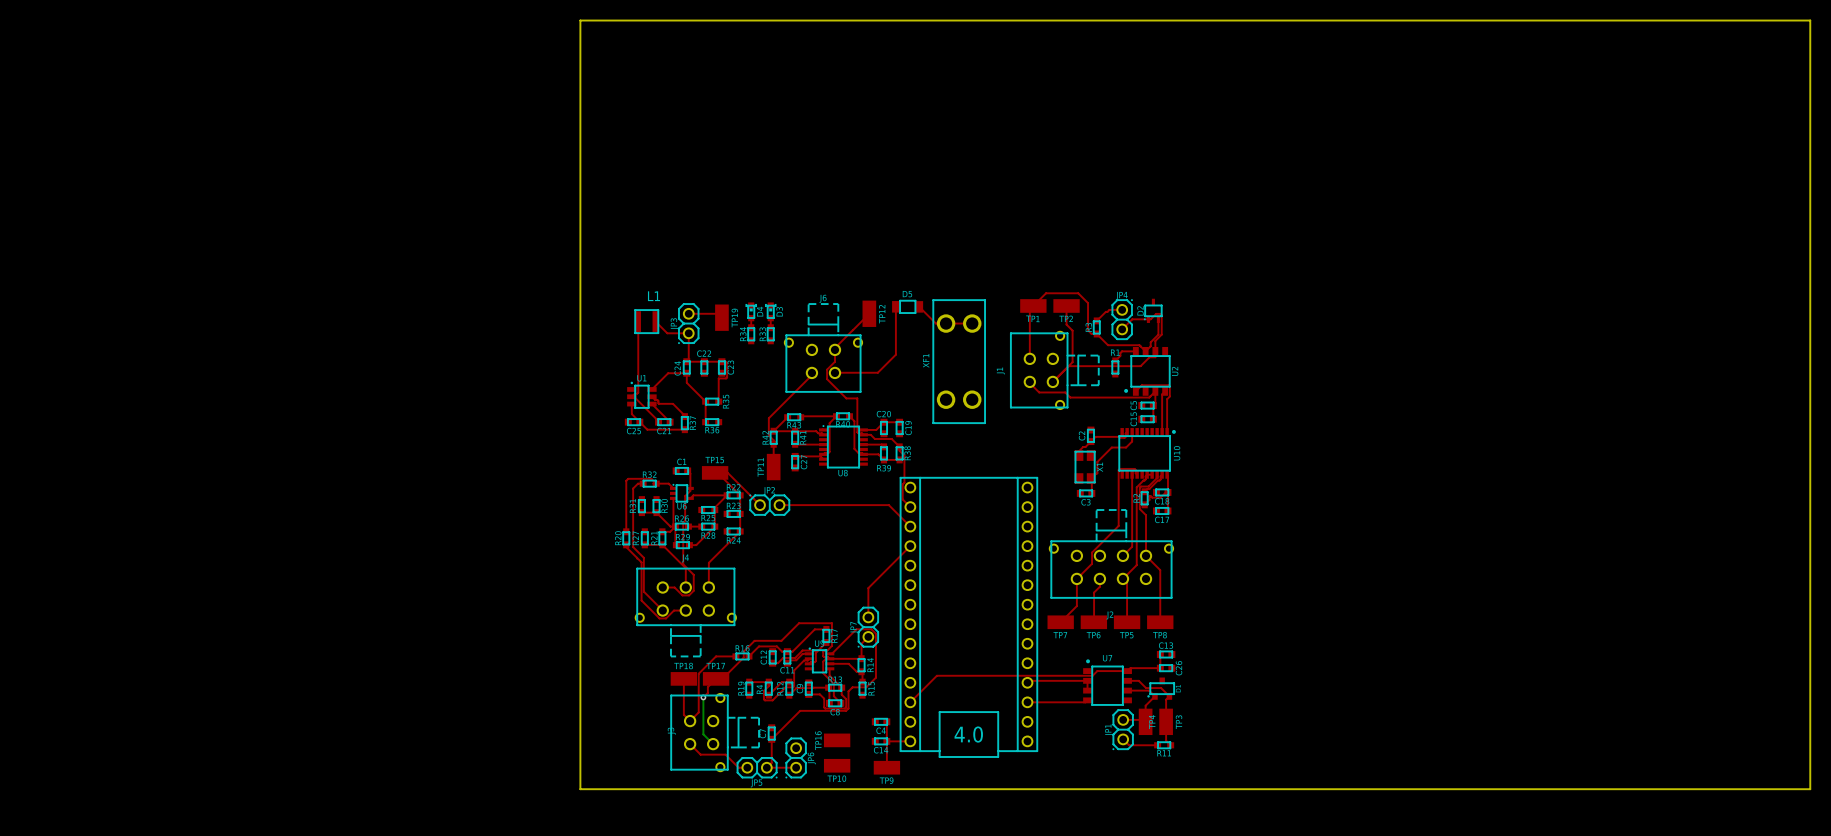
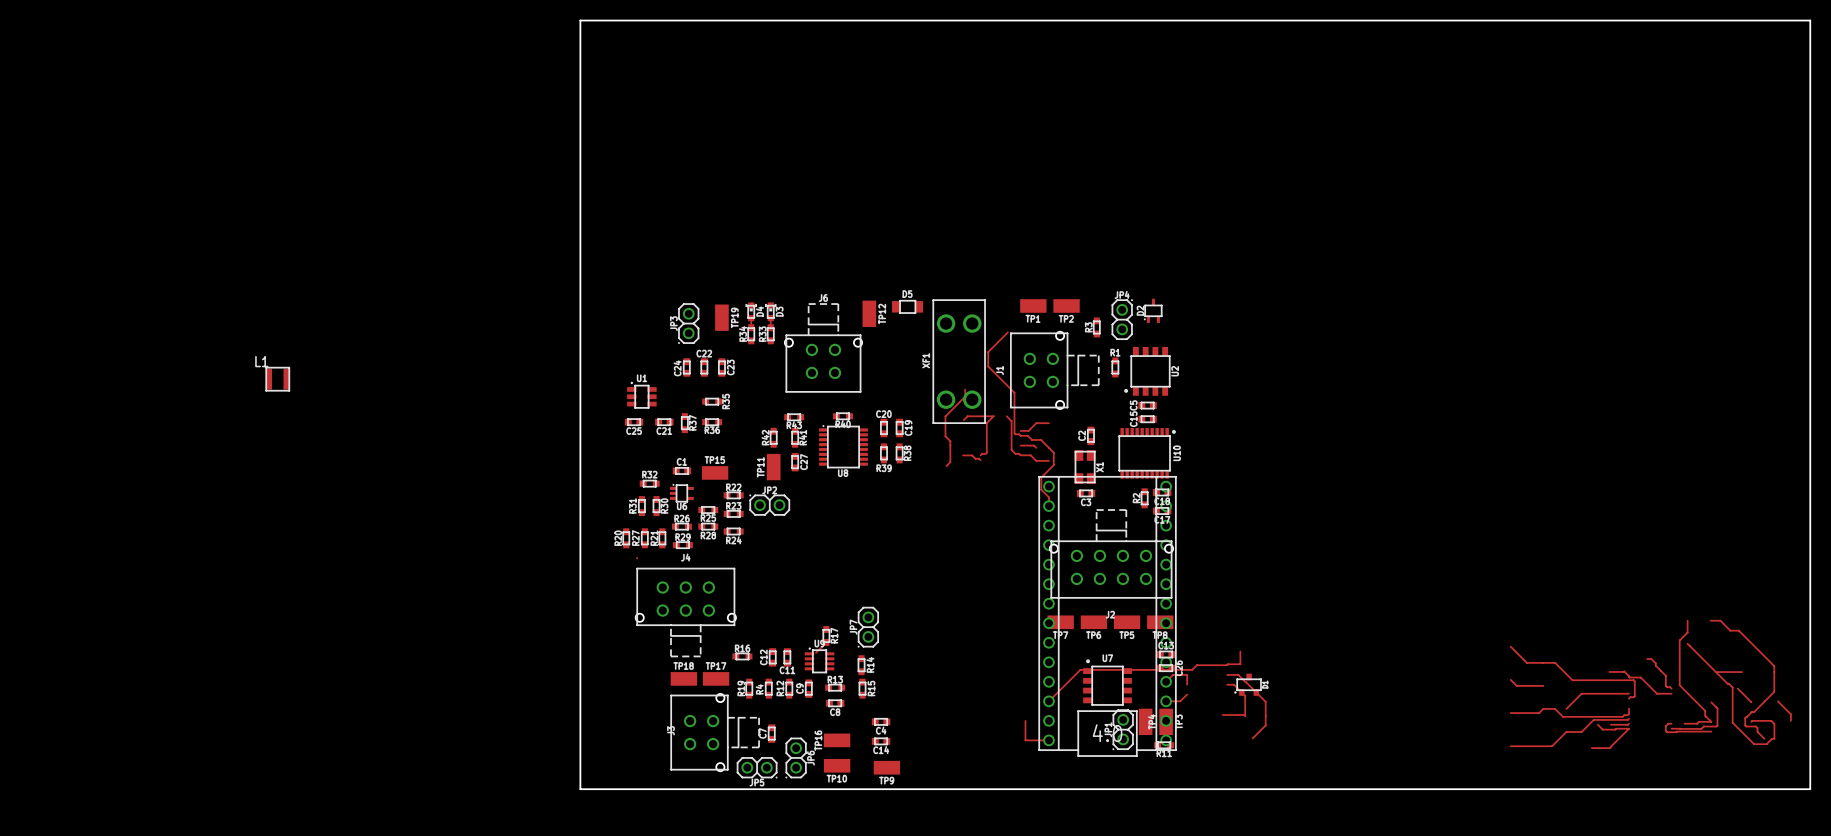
L1 name position: L1 (654, 296) -> L1 (261, 361)
top track: (1066, 305) (1066, 324) (1072, 330) (1072, 362) (1052, 381) -> none
top track: (895, 306) (895, 354) (877, 372) (834, 372) -> none
top track: (919, 306) (935, 323) (972, 323) -> none
top track: (1122, 309) (1109, 309) (1096, 320) -> none
top track: (688, 313) (718, 313) (721, 317) -> none
top track: (869, 313) (852, 330) -> none
top track: (1158, 319) (1158, 334) (1150, 342) (1150, 346) (1145, 351) (1140, 346) -> none
top track: (637, 321) (638, 392) (631, 396) (634, 396) (658, 422) -> none
L1 position: (646, 321) -> (277, 379)
top track: (655, 321) (667, 333) (688, 333) (688, 359) (686, 361) (726, 362) (727, 377) (718, 378) (718, 401) -> none
top track: (1122, 329) (1132, 319) (1150, 319) (1156, 313) (1160, 313) (1161, 334) (1155, 340) (1155, 357) (1149, 357) (1140, 366) (1068, 366) -> none
top track: (852, 330) (834, 348) (834, 361) (827, 369) (827, 379) (846, 398) (857, 398) (858, 433) (870, 434) (874, 438) (891, 438) (899, 446) (899, 450) (904, 455) (902, 499) (910, 507) -> none
top track: none -> (1007, 332) (988, 352) (988, 366) (1014, 392) (1014, 433) (1027, 435) (1032, 439) (1041, 439) (1053, 452) (1053, 465) (1041, 477) (1041, 489) (1048, 497) (1048, 506)
top track: (1140, 346) (1108, 345) (1096, 333) (1091, 333) (1088, 330) (1088, 303) (1078, 293) (1046, 293) (1029, 309) (1029, 358) -> none
top track: (1135, 351) (1122, 351) (1115, 360) -> none
top track: (811, 372) (811, 375) (768, 418) (768, 435) (773, 440) (773, 467) -> none
top track: (1029, 381) (1039, 392) (1065, 392) (1070, 397) (1149, 397) (1155, 391) (1153, 419) -> none
top track: (651, 389) (668, 373) (686, 373) (686, 382) (705, 401) (705, 422) -> none
top track: none -> (965, 389) (965, 396) (945, 416) (945, 436) (950, 441) (950, 462) (946, 466)
top track: (1135, 391) (1141, 385) (1169, 386) (1169, 396) (1167, 399) (1167, 432) -> none
top track: (1165, 391) (1162, 394) (1162, 432) -> none
top track: (651, 396) (657, 399) (659, 403) (672, 403) (684, 416) -> none
top track: (631, 404) (631, 414) (647, 429) (684, 429) -> none
top track: (652, 404) (670, 422) -> none
top track: (849, 416) (854, 421) (854, 448) (858, 452) (878, 454) (883, 459) (899, 459) -> none
top track: none -> (1006, 416) (1011, 421) (1011, 449) (1020, 455) (1030, 455) (1036, 460) (1048, 460)
top track: (787, 417) (773, 431) (816, 431) (823, 434) -> none
top track: (800, 417) (836, 416) (829, 423) (829, 451) (823, 454) -> none
top track: none -> (963, 420) (967, 416) (993, 416) (986, 423) (986, 452) (980, 455)
top track: (899, 422) (883, 422) (876, 429) (863, 429) -> none
top track: none -> (1048, 423) (1036, 423) (1028, 430) (1020, 430)
top track: (1127, 432) (1124, 437) (1095, 436) (1078, 451) (1078, 455) -> none
top track: (1132, 432) (1132, 441) (1126, 447) (1111, 447) (1097, 461) (1097, 473) (1091, 478) (1091, 493) -> none
top track: (795, 444) (823, 444) -> none
top track: (863, 444) (881, 444) (883, 446) -> none
top track: none -> (1020, 445) (1034, 445) (1036, 447)
top track: none -> (963, 455) (972, 455) (980, 460)
top track: (795, 456) (820, 456) (823, 459) -> none
top track: (687, 470) (690, 473) (690, 490) (685, 496) (683, 564) (693, 574) (693, 590) (689, 595) (682, 595) (674, 587) (662, 587) -> none
top track: (716, 471) (727, 472) (760, 505) -> none
top track: (717, 472) (740, 495) (740, 531) (708, 562) (708, 587) -> none
top track: (1132, 474) (1132, 546) (1122, 555) -> none
top track: (1137, 474) (1134, 468) (1118, 469) (1118, 525) (1092, 552) (1092, 563) (1076, 578) (1076, 606) (1060, 622) -> none
top track: (1152, 474) (1147, 474) (1145, 479) (1136, 487) (1136, 565) (1122, 578) (1127, 583) (1127, 622) -> none
top track: (1157, 474) (1157, 477) (1148, 486) (1139, 487) (1139, 509) (1146, 515) (1146, 555) (1160, 570) (1160, 622) -> none
top track: (1162, 474) (1159, 480) (1145, 491) -> none
top track: (1167, 474) (1167, 510) -> none
top track: (653, 483) (668, 483) (673, 488) -> none
top track: (656, 483) (651, 478) (628, 478) (626, 480) (626, 531) -> none
top track: (643, 484) (638, 483) (633, 488) (633, 547) (643, 557) (643, 591) (662, 610) -> none
top track: (1167, 492) (1160, 497) (1149, 496) (1149, 499) (1144, 504) -> none
top track: (673, 498) (673, 524) (675, 526) -> none
top track: (690, 498) (693, 495) (727, 495) (714, 507) (714, 526) (696, 545) (689, 545) -> none
top track: (779, 505) (888, 505) (910, 526) -> none
top track: (641, 512) (656, 512) (670, 526) (675, 526) -> none
top track: (675, 526) (676, 545) -> none
top track: (675, 526) (670, 531) (662, 531) -> none
top track: (688, 526) (701, 526) -> none
top track: (626, 544) (641, 562) (641, 600) (659, 618) (666, 618) (673, 610) (685, 610) -> none
top track: (644, 544) (662, 544) (685, 568) (685, 587) -> none
top track: (910, 546) (868, 588) (868, 617) -> none
top track: (1099, 578) (1099, 586) (1094, 592) (1093, 622) -> none
part position: (968, 617) -> (1107, 616)
top track: none -> (1687, 620) (1687, 632) (1679, 640) (1679, 685) (1705, 710) (1705, 715) (1711, 721) (1684, 723)
top track: none -> (1710, 620) (1720, 620) (1730, 630) (1738, 630) (1774, 666) (1774, 691) (1754, 712) (1751, 712)
top track: (826, 629) (814, 629) (792, 651) (782, 651) (776, 646) (758, 646) (748, 656) -> none
top track: (868, 636) (861, 643) (861, 658) (825, 658) (823, 661) (823, 673) (833, 683) (833, 696) (840, 703) -> none
top track: none -> (1687, 643) (1732, 687) (1732, 722) (1754, 744) (1766, 744) (1774, 738) (1774, 723) (1771, 720) (1751, 721)
top track: none -> (1510, 646) (1526, 662) (1555, 662) (1572, 680) (1633, 680) (1634, 696) (1628, 698)
top track: none -> (1240, 651) (1240, 664) (1196, 665) (1192, 669) (1080, 669) (1048, 701)
top track: (809, 653) (802, 653) (796, 660) (790, 660) (787, 663) -> none
top track: (829, 653) (831, 653) (856, 629) (871, 629) (875, 633) (875, 677) (866, 687) (852, 687) (848, 691) (848, 708) (846, 710) (800, 710) (771, 739) (771, 762) (766, 767) (796, 767) -> none
top track: (1160, 654) (1160, 668) (1097, 671) (1092, 675) (936, 675) (910, 702) -> none
top track: (735, 656) (716, 656) (698, 673) (698, 712) (690, 721) (683, 714) (683, 678) -> none
top track: (795, 657) (802, 650) (814, 650) (815, 661) (811, 662) (809, 663) (811, 662) -> none
top track: (795, 657) (783, 657) (777, 663) (772, 663) -> none
top track: (809, 658) (804, 660) (794, 670) (794, 686) (785, 687) (772, 700) (763, 699) (763, 691) (768, 686) (768, 682) (749, 682) -> none
top track: (829, 658) (823, 656) (823, 651) (831, 645) (831, 623) (799, 623) (781, 640) (754, 640) (743, 651) (743, 657) (722, 678) (716, 678) -> none
top track: none -> (1647, 659) (1651, 659) (1655, 663) (1665, 675) (1665, 686) (1671, 688)
top track: (829, 663) (848, 663) (856, 671) (862, 672) (862, 682) -> none
top track: (829, 668) (829, 675) (841, 687) (841, 694) (846, 699) (846, 707) (825, 708) (824, 698) (819, 694) (808, 694) -> none
top track: none -> (1609, 671) (1624, 671) (1629, 677) (1640, 677) (1656, 693) (1671, 693)
top track: none -> (1715, 672) (1742, 672)
top track: none -> (1227, 674) (1238, 674) (1265, 701) (1265, 725) (1252, 738)
top track: (716, 678) (707, 687) (707, 692) (703, 697) -> none
top track: none -> (1510, 679) (1516, 685) (1543, 685)
top track: (1127, 680) (1138, 680) (1146, 688) (1161, 688) (1169, 696) (1166, 699) (1166, 740) (1170, 745) -> none
top track: none -> (1166, 681) (1172, 674) (1187, 674) (1187, 684)
top track: (789, 682) (781, 682) (768, 695) -> none
top track: (1027, 682) (1029, 680) (1087, 680) (1087, 690) -> none
top track: none -> (1227, 684) (1234, 684) (1245, 695) (1245, 715) (1222, 715)
part position: (1160, 688) -> (1247, 684)
top track: none -> (1737, 688) (1751, 702)
top track: (1127, 690) (1149, 690) (1154, 696) (1145, 705) (1145, 721) (1143, 719) (1123, 719) -> none
top track: none -> (1628, 693) (1581, 693) (1566, 708)
top track: none -> (1187, 694) (1180, 701) (1166, 701)
top track: (789, 695) (796, 688) (828, 687) (829, 703) (830, 702) -> none
bottom track: (703, 697) (703, 734) (713, 744) -> none
via: (703, 697) -> none
top track: (1087, 700) (1085, 702) (1027, 702) -> none
top track: none -> (1777, 701) (1790, 714) (1790, 720)
top track: none -> (1711, 702) (1717, 708) (1716, 726) (1703, 726) (1701, 728) (1671, 728)
top track: none -> (1628, 708) (1628, 713) (1622, 716) (1563, 716) (1555, 708) (1543, 708) (1539, 713) (1510, 713)
top track: none -> (1751, 712) (1745, 718) (1745, 725) (1756, 726) (1757, 731) (1764, 738)
top track: none -> (1628, 718) (1593, 719) (1581, 732) (1566, 732) (1552, 746) (1510, 746)
top track: (886, 721) (886, 741) (910, 741) -> (1025, 720) (1025, 740) (1048, 740)
top track: none -> (1628, 723) (1610, 724)
top track: none -> (1671, 723) (1665, 726) (1666, 732) (1711, 731)
top track: none -> (1597, 724) (1602, 729) (1628, 728) (1610, 748) (1591, 748)
top track: (1123, 739) (1129, 745) (1157, 745) -> none
top track: (886, 741) (886, 767) -> none
top track: (690, 744) (700, 754) (725, 754) (738, 767) (747, 767) -> none

